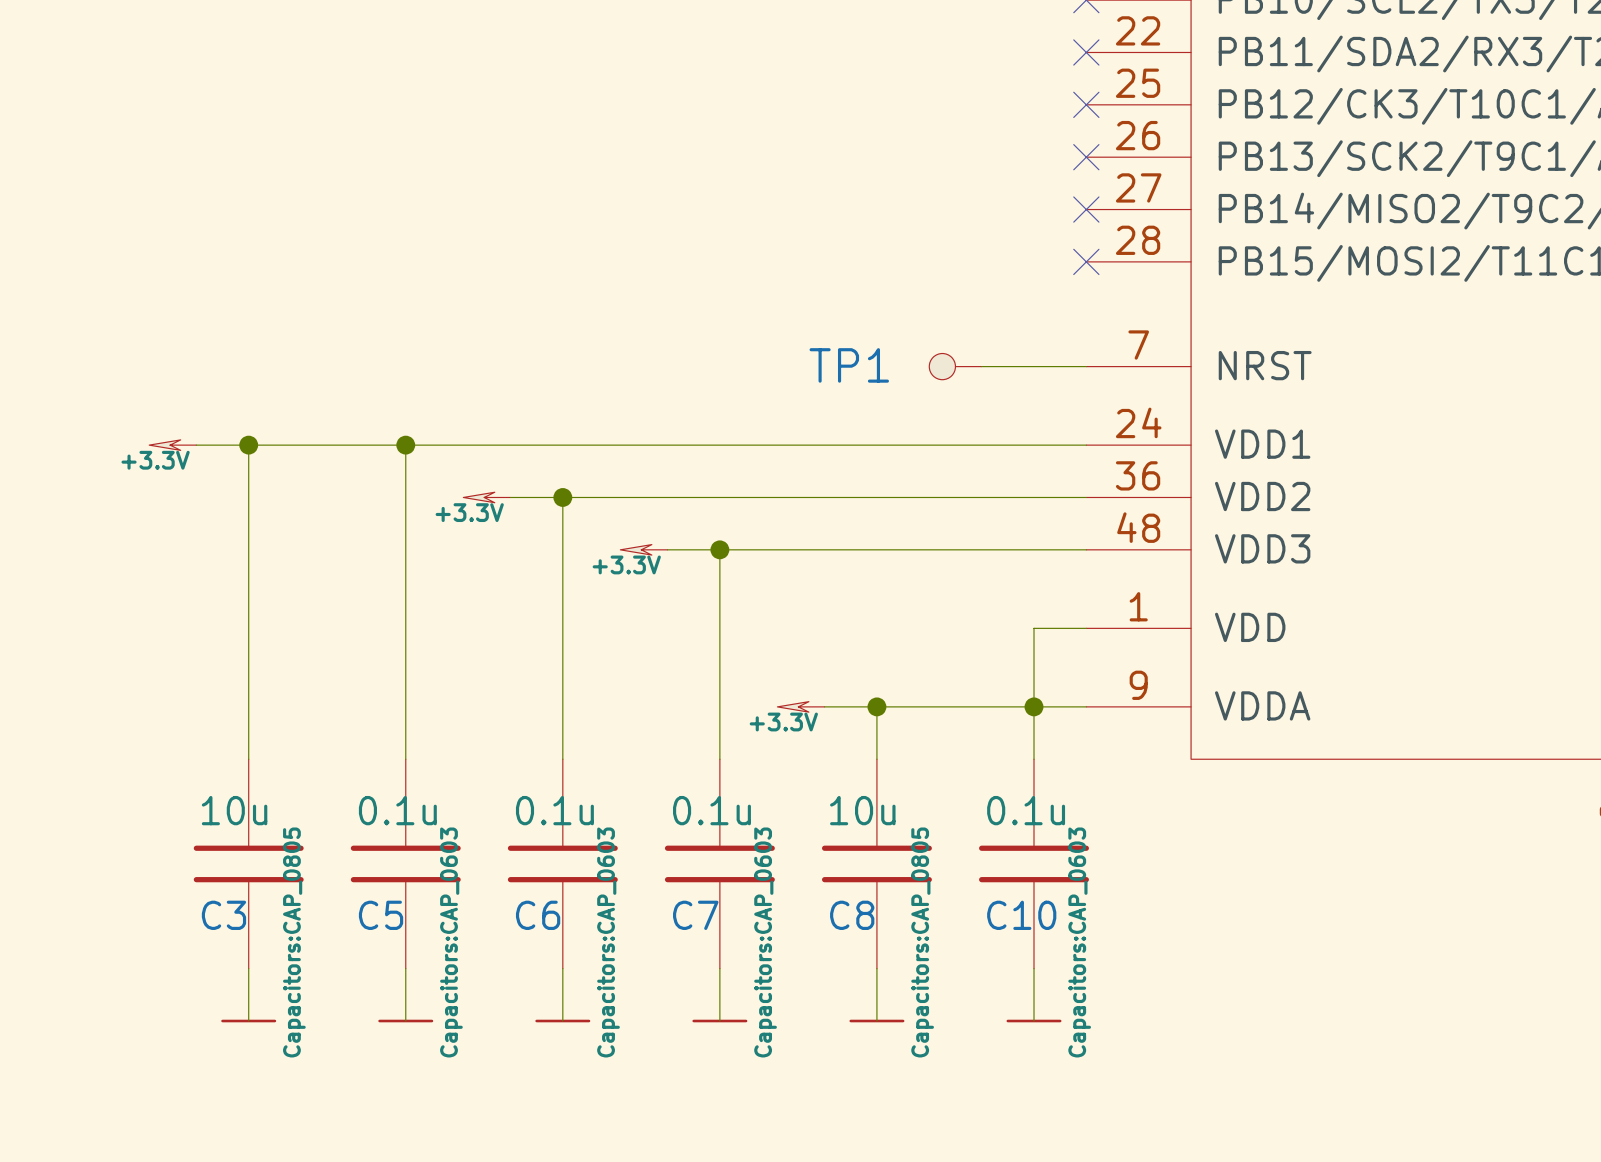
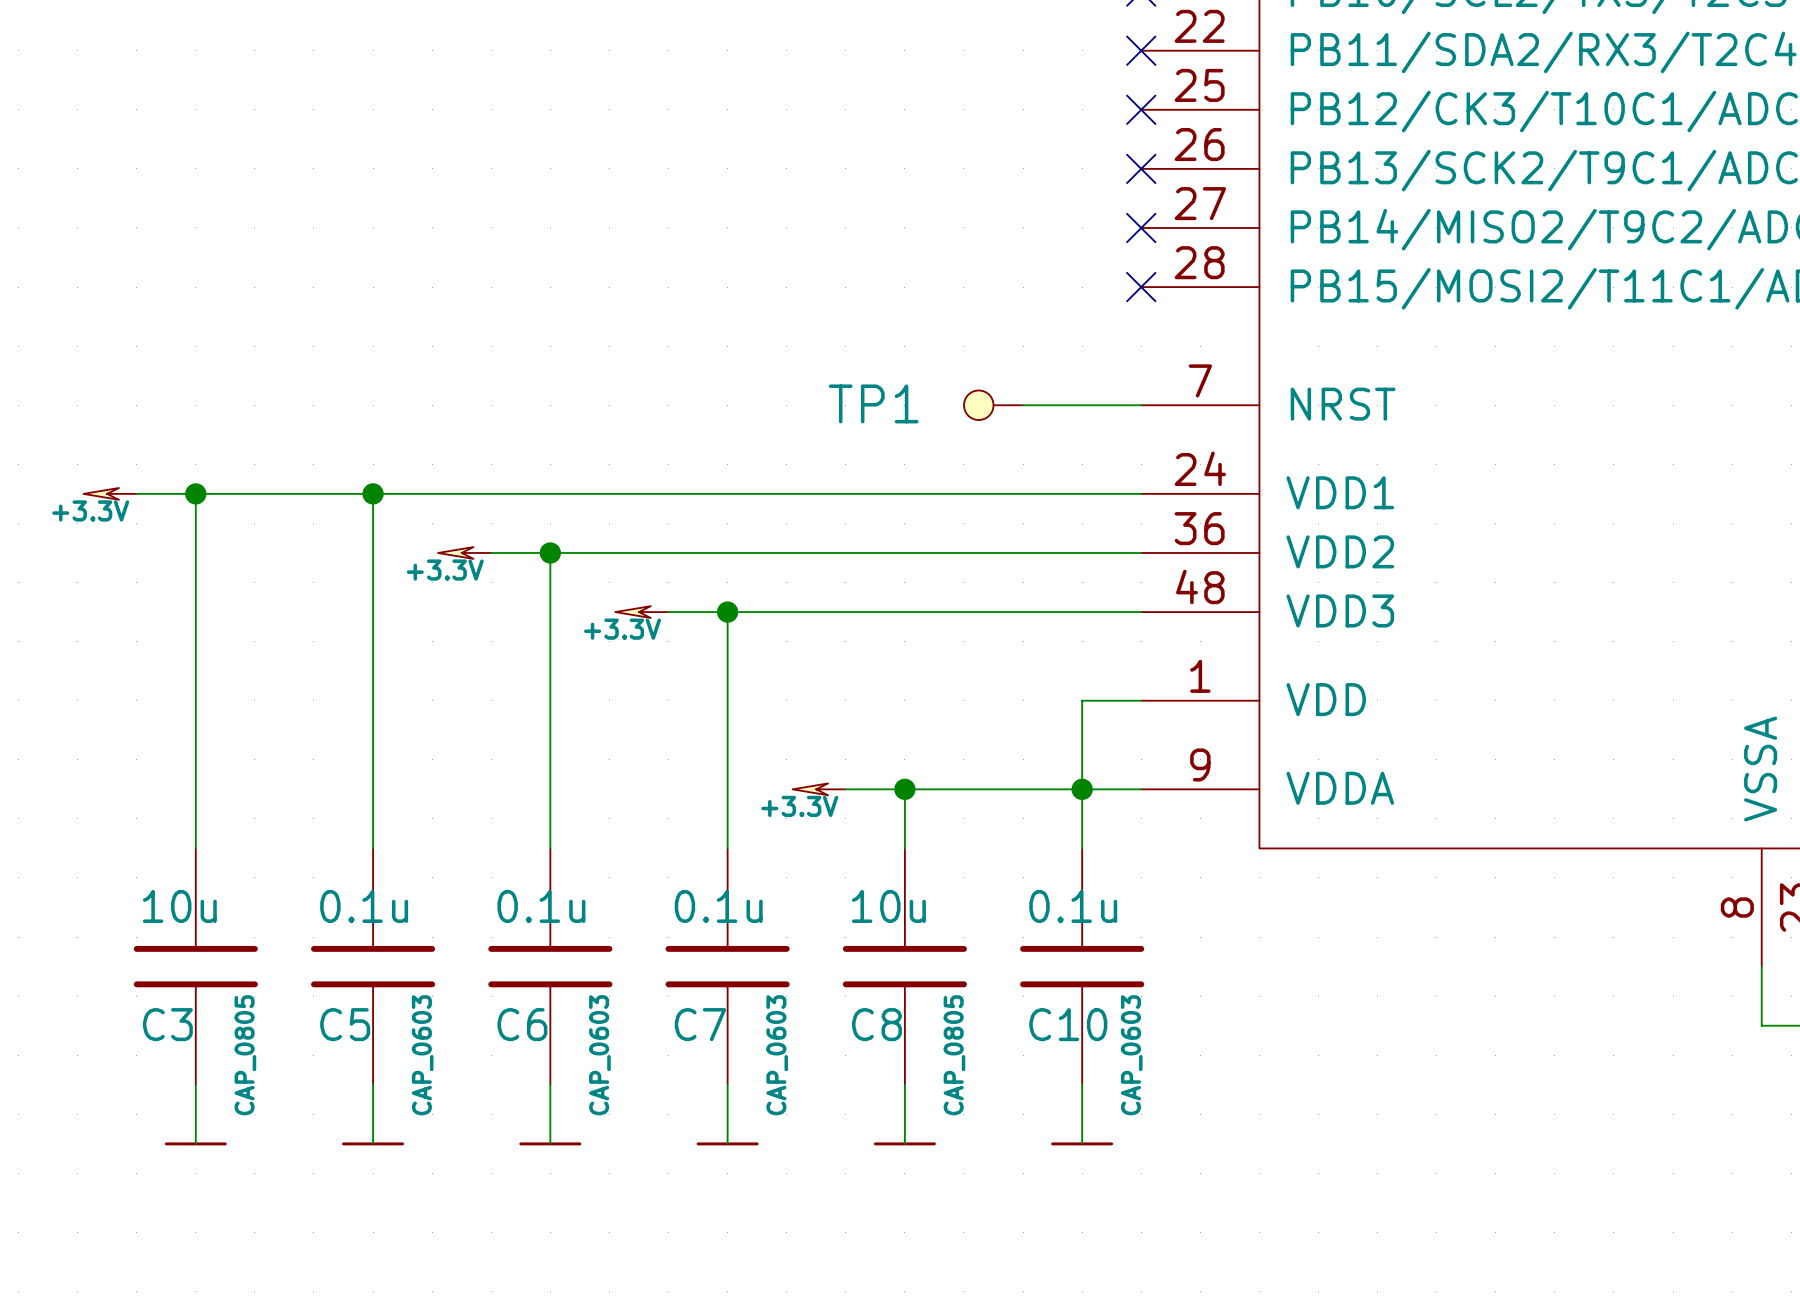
C3 text: Capacitors:CAP_0805 (294, 942) -> CAP_0805 (245, 1055)
C5 text: Capacitors:CAP_0603 (451, 942) -> CAP_0603 (422, 1055)
C6 text: Capacitors:CAP_0603 (608, 942) -> CAP_0603 (599, 1055)
C7 text: Capacitors:CAP_0603 (765, 942) -> CAP_0603 (777, 1055)
C8 text: Capacitors:CAP_0805 (922, 942) -> CAP_0805 (954, 1055)
C10 text: Capacitors:CAP_0603 (1079, 942) -> CAP_0603 (1131, 1055)

